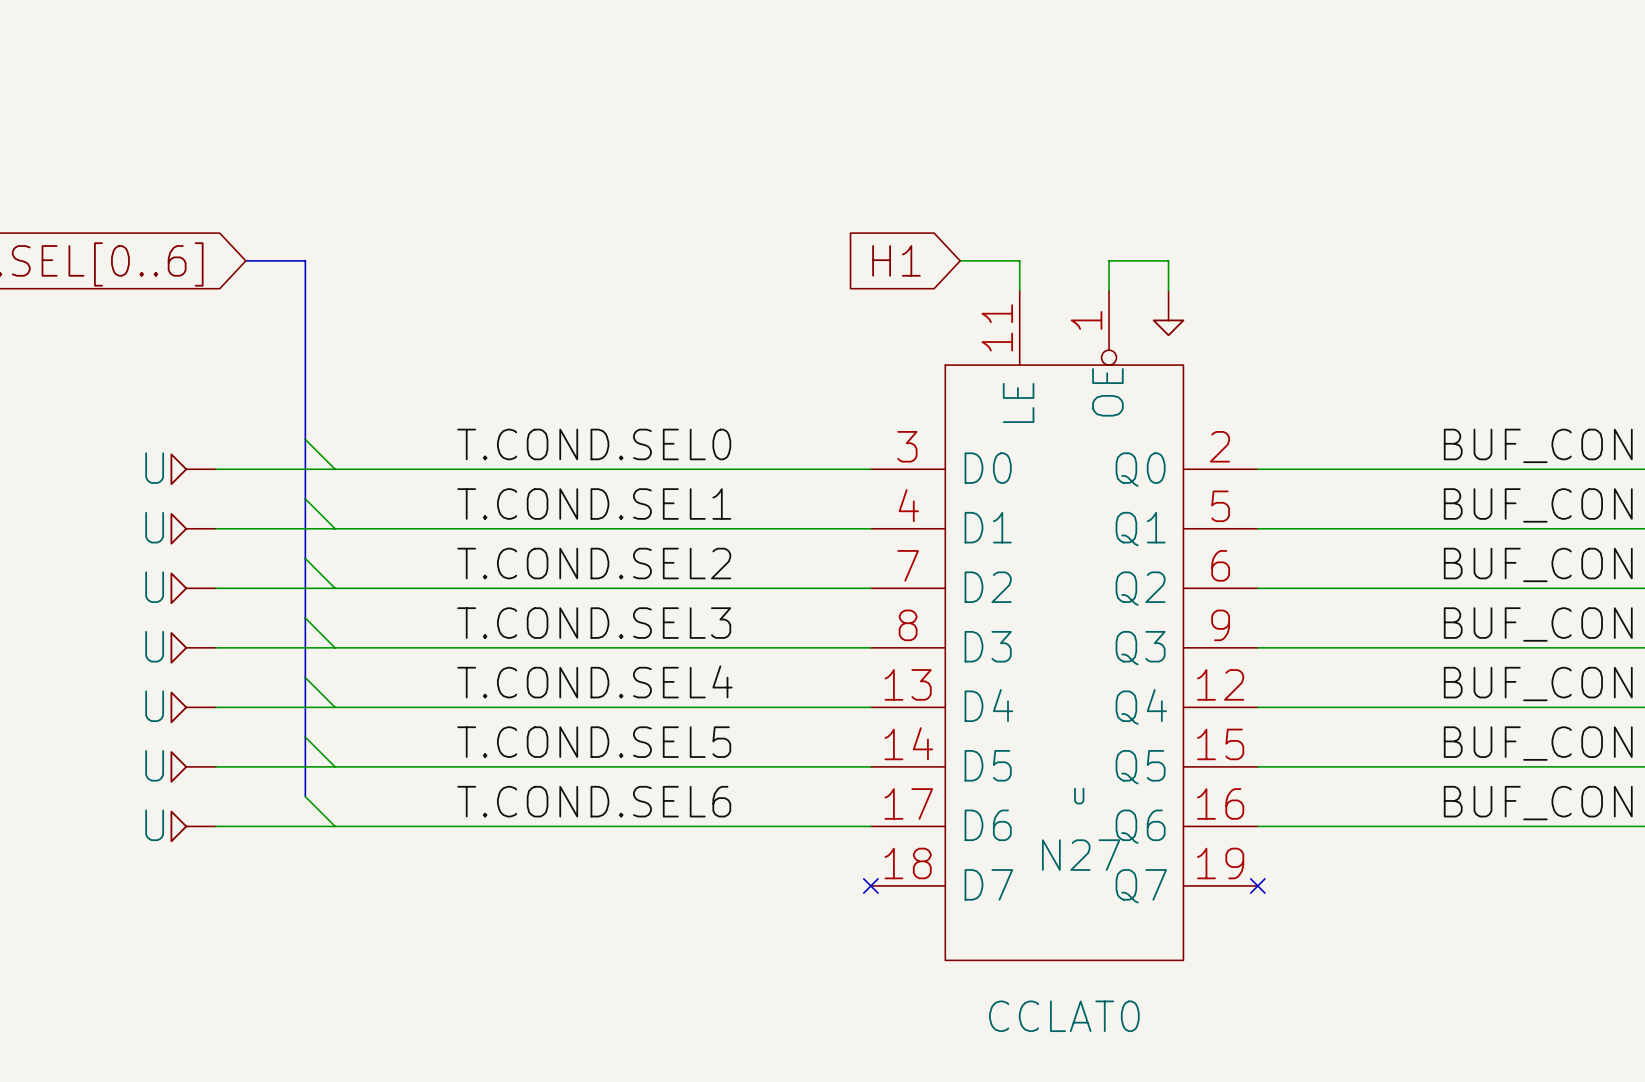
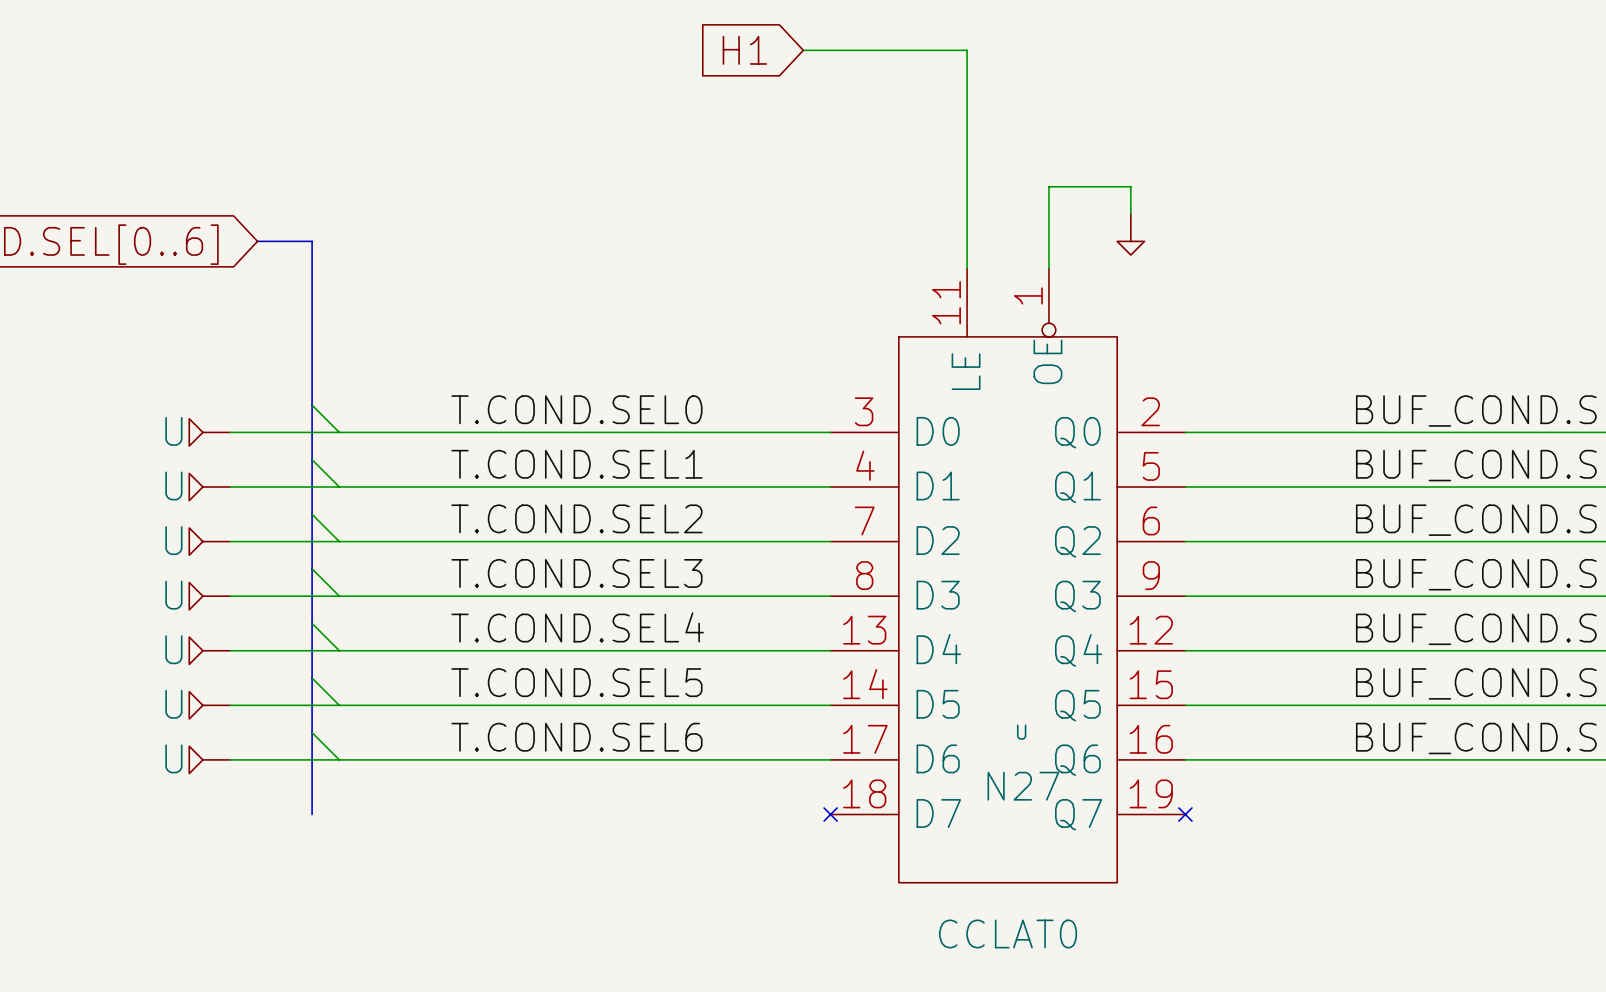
global label position: H1 (896, 260) -> H1 (744, 50)
wire: (960, 260) (1019, 260) -> (803, 50) (967, 50) (967, 241)
wire: (1109, 260) (1168, 260) (1168, 290) -> (1048, 241) (1048, 186) (1130, 186) (1130, 214)
power symbol position: (1168, 313) -> (1130, 234)
bus: none -> (312, 732) (312, 814)

